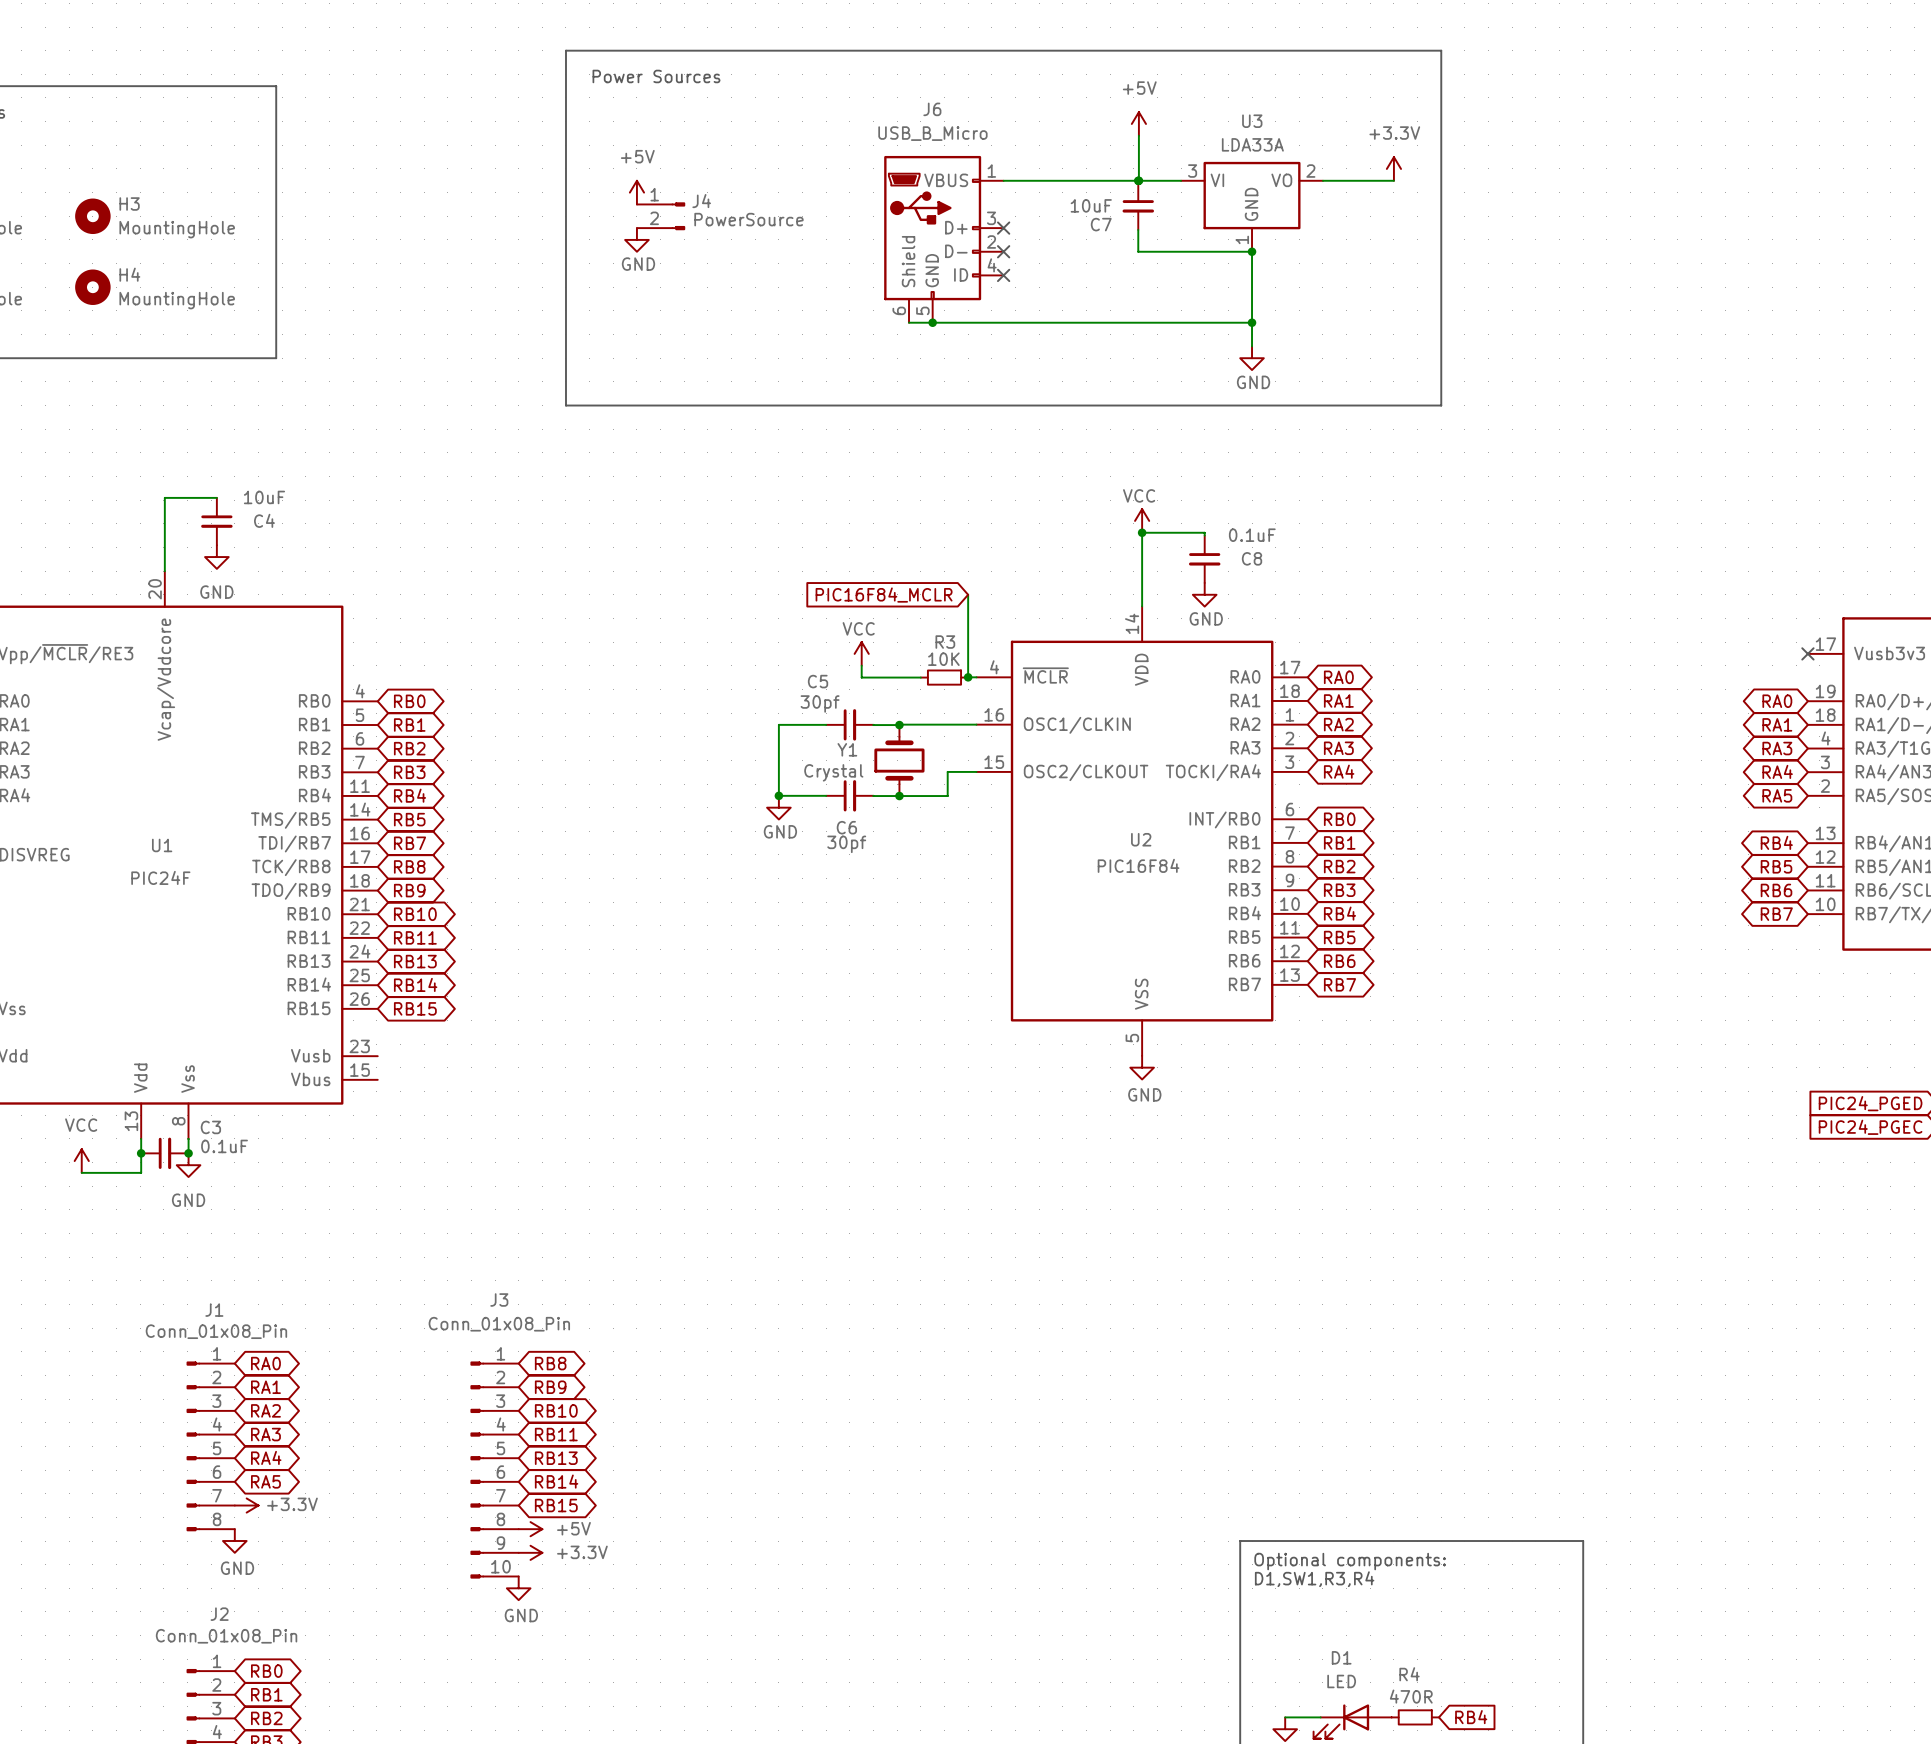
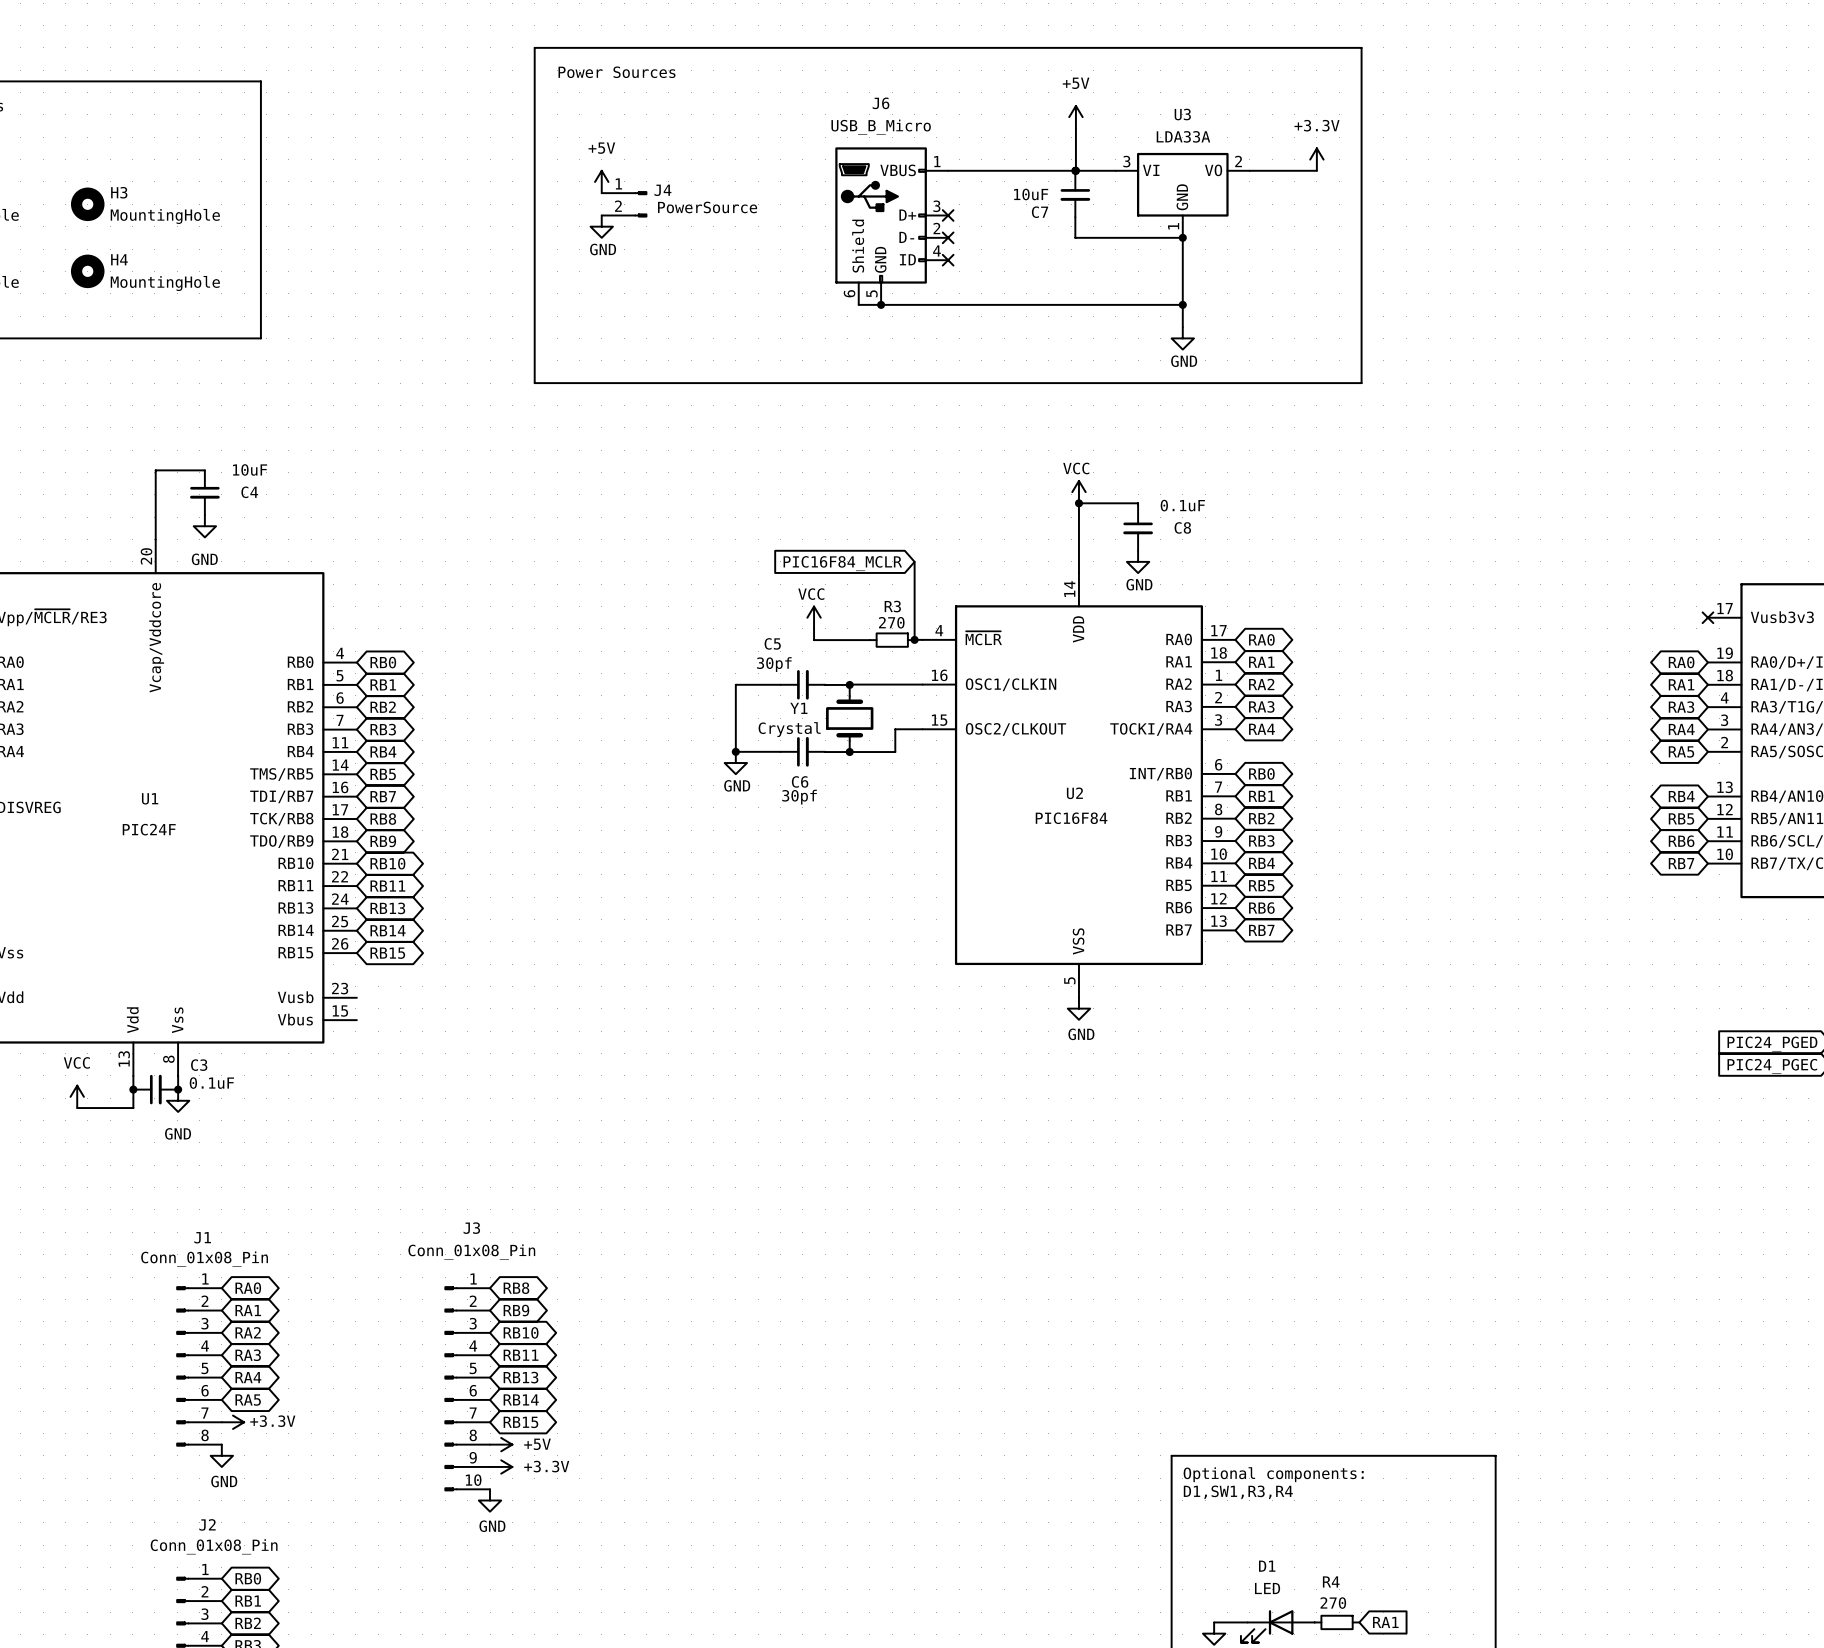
R3 value: 10K (943, 659) -> 270 (891, 622)
R4 value: 470R (1411, 1696) -> 270 (1333, 1603)
global label: RB4 (1471, 1717) -> RA1 (1385, 1622)

